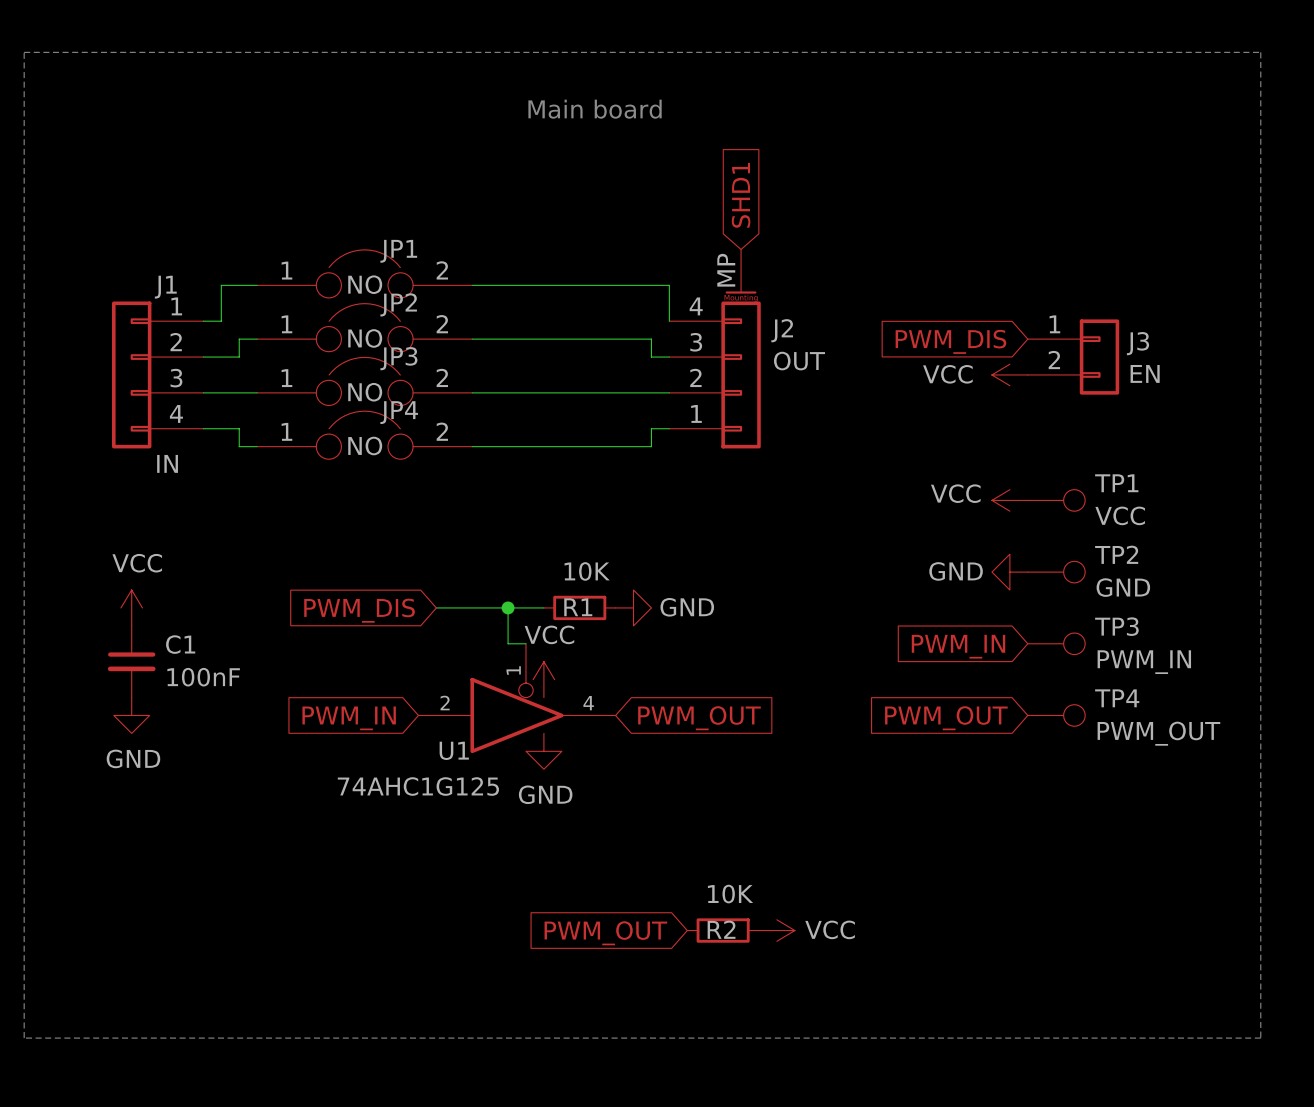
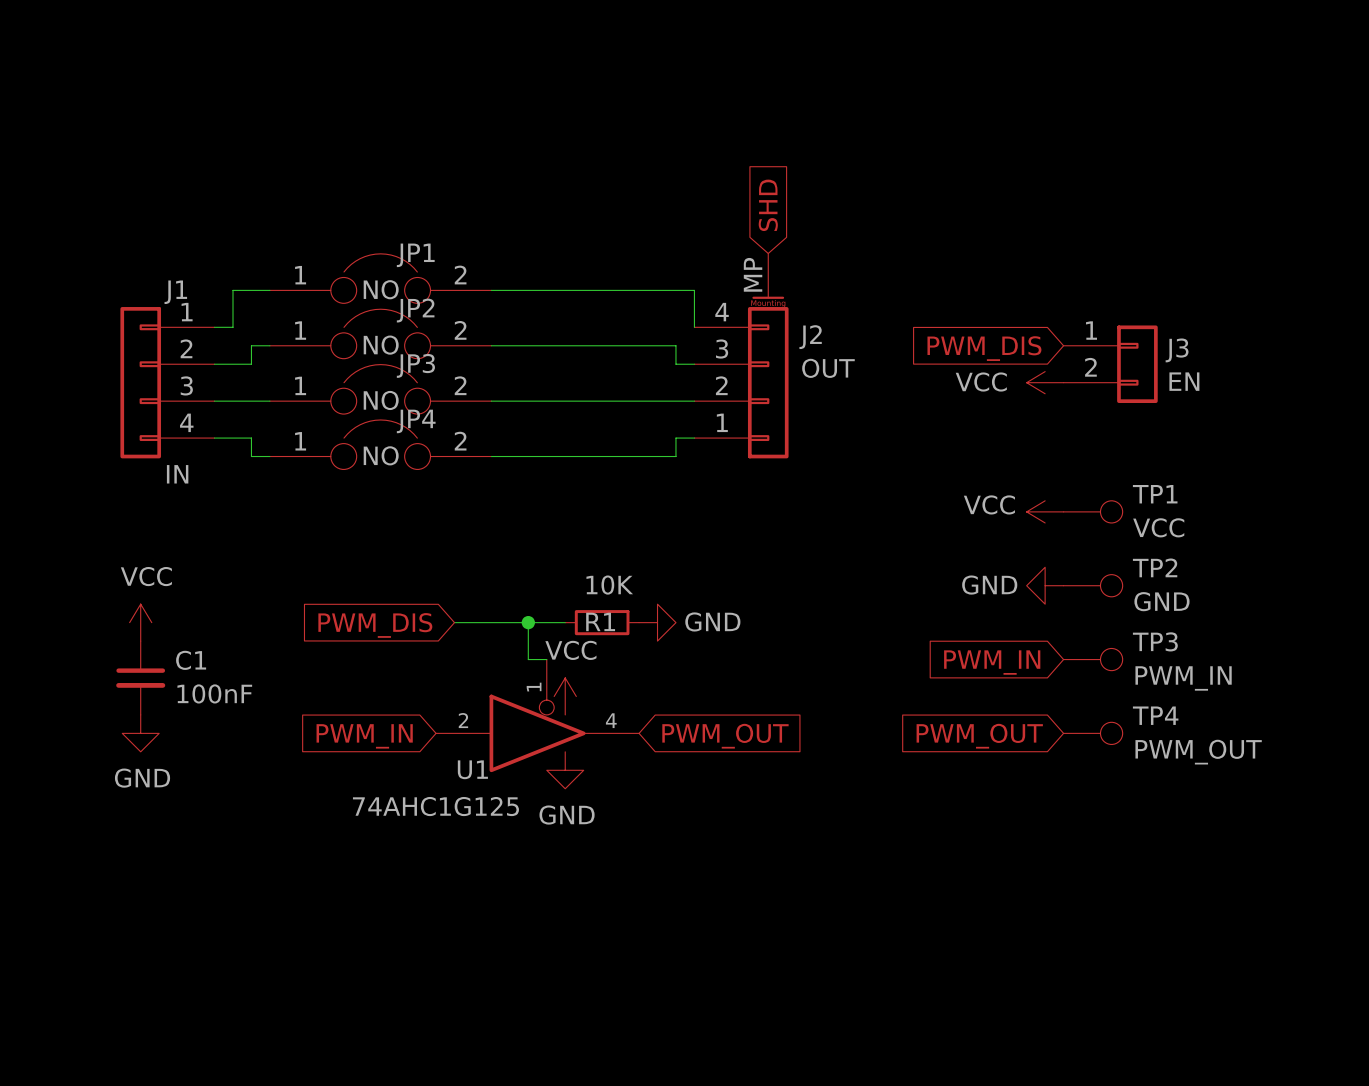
line: (24, 52) (1260, 52) (1260, 1038) (24, 1038) (24, 52) -> none
text: Main board (595, 109) -> none
global label: SHD1 (741, 195) -> SHD (768, 205)
R2: 10K (723, 930) -> none
power symbol: VCC (776, 930) -> none
global label: PWM_OUT (605, 933) -> none

